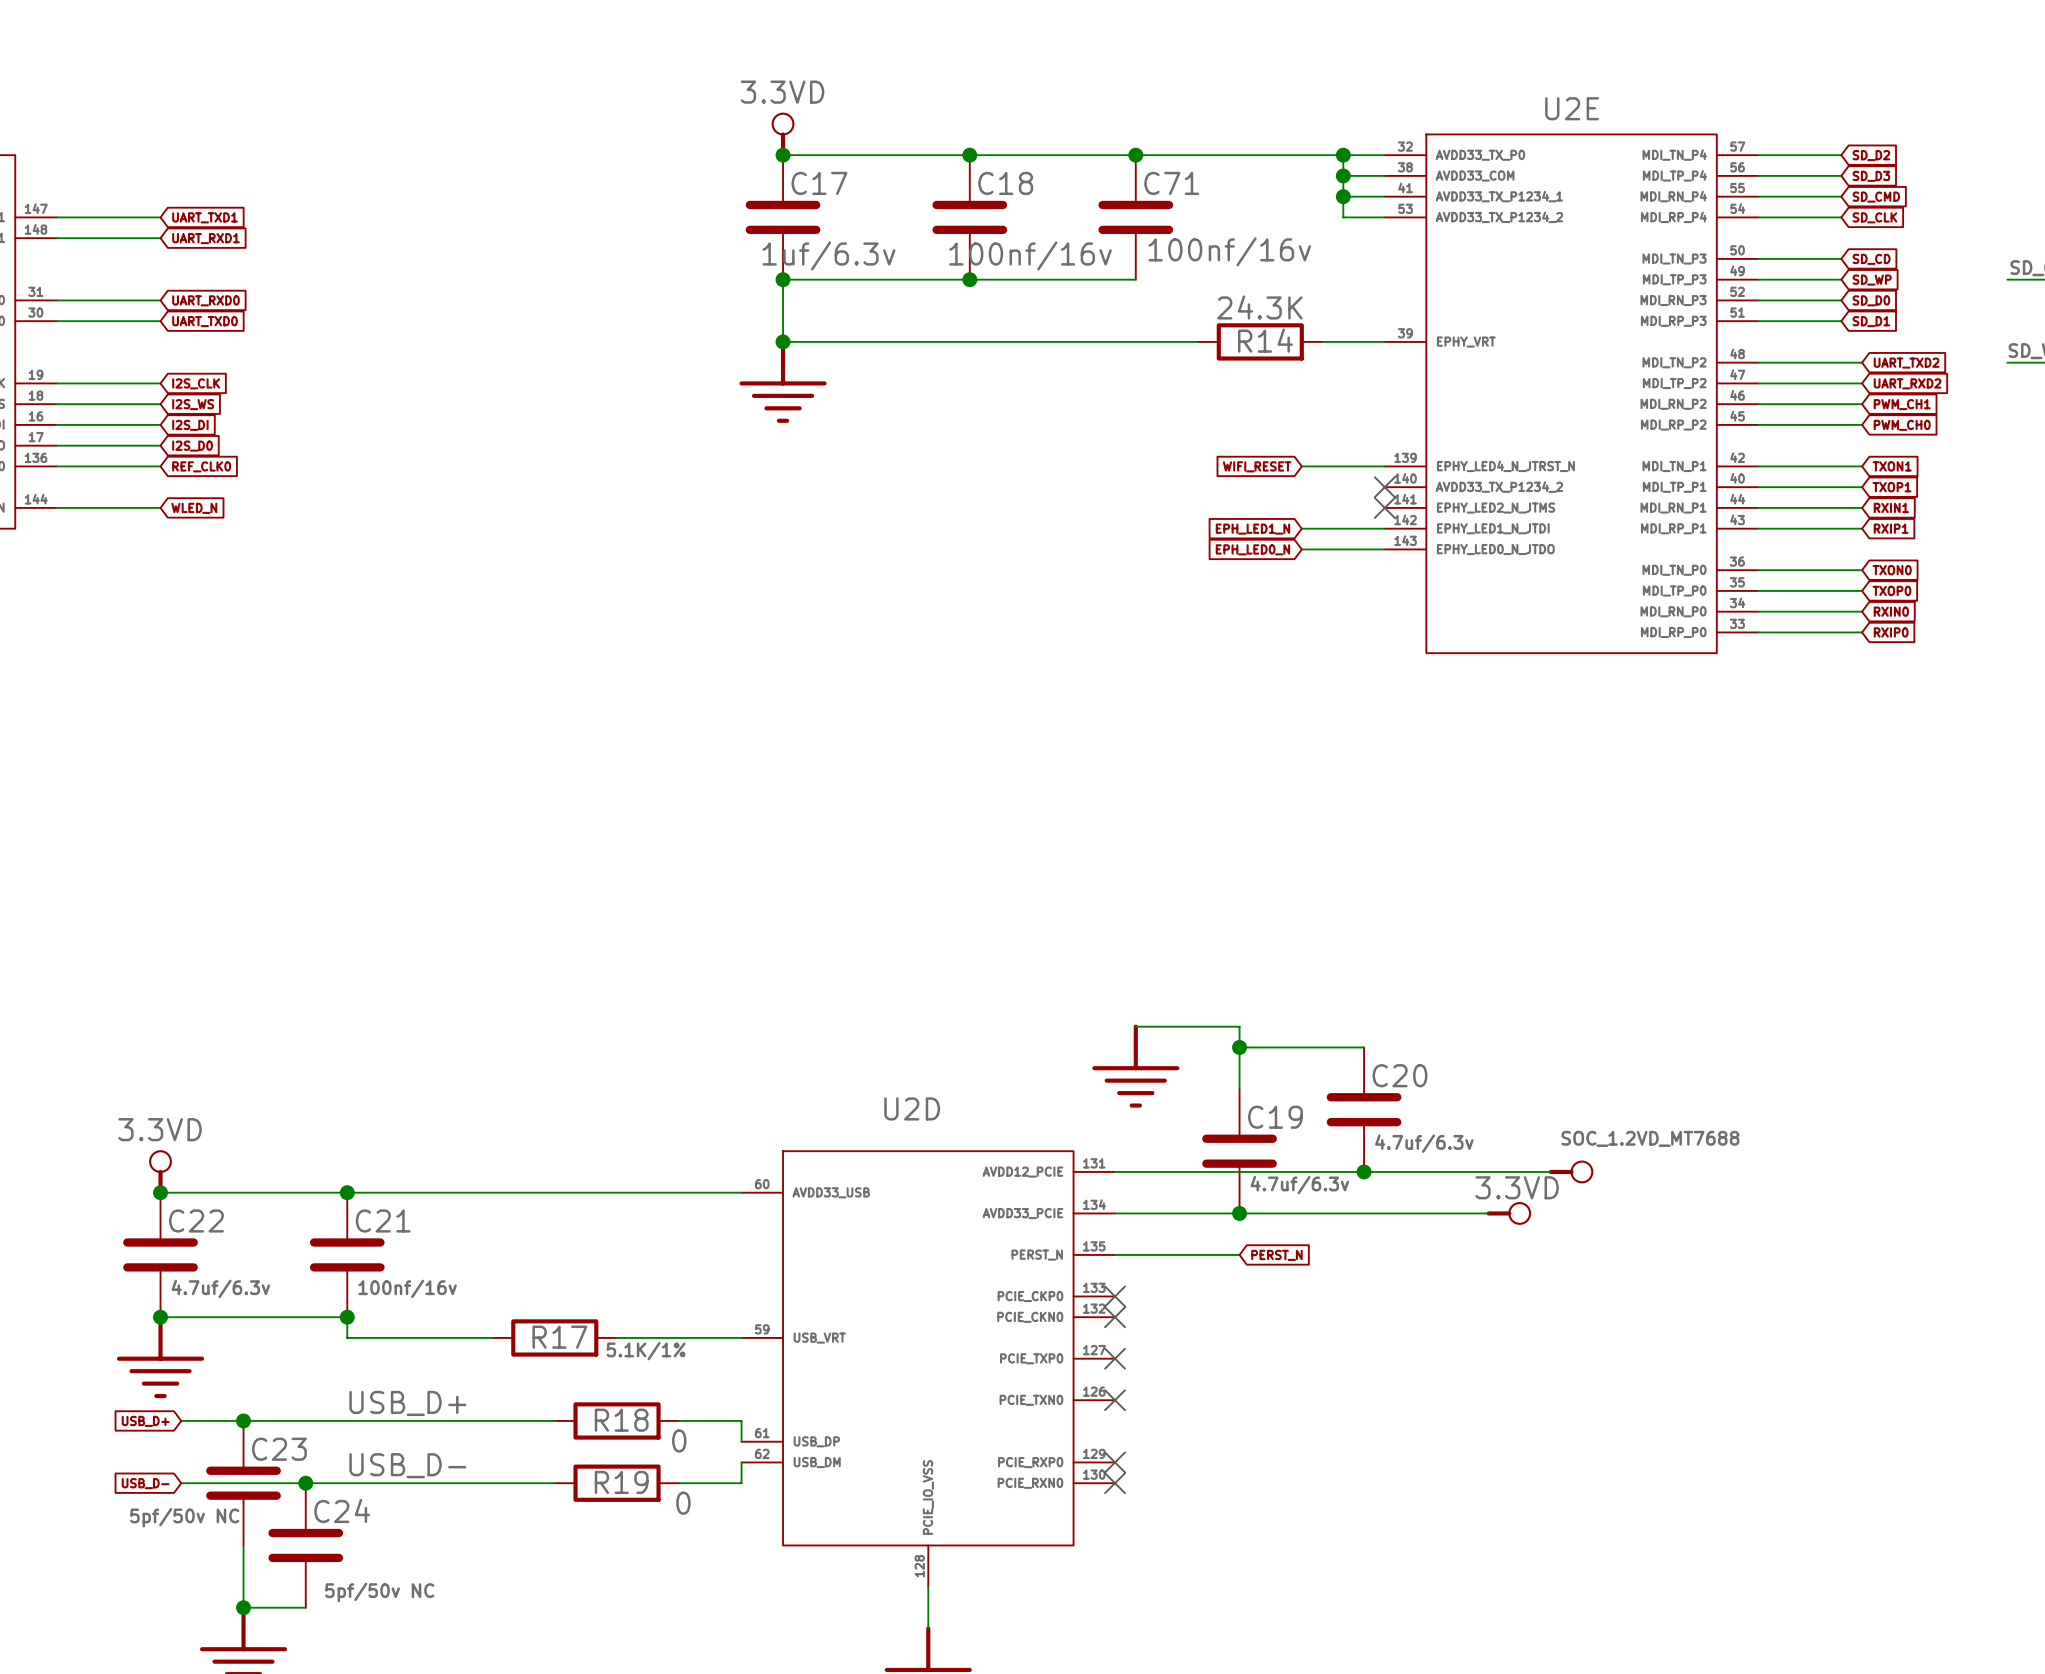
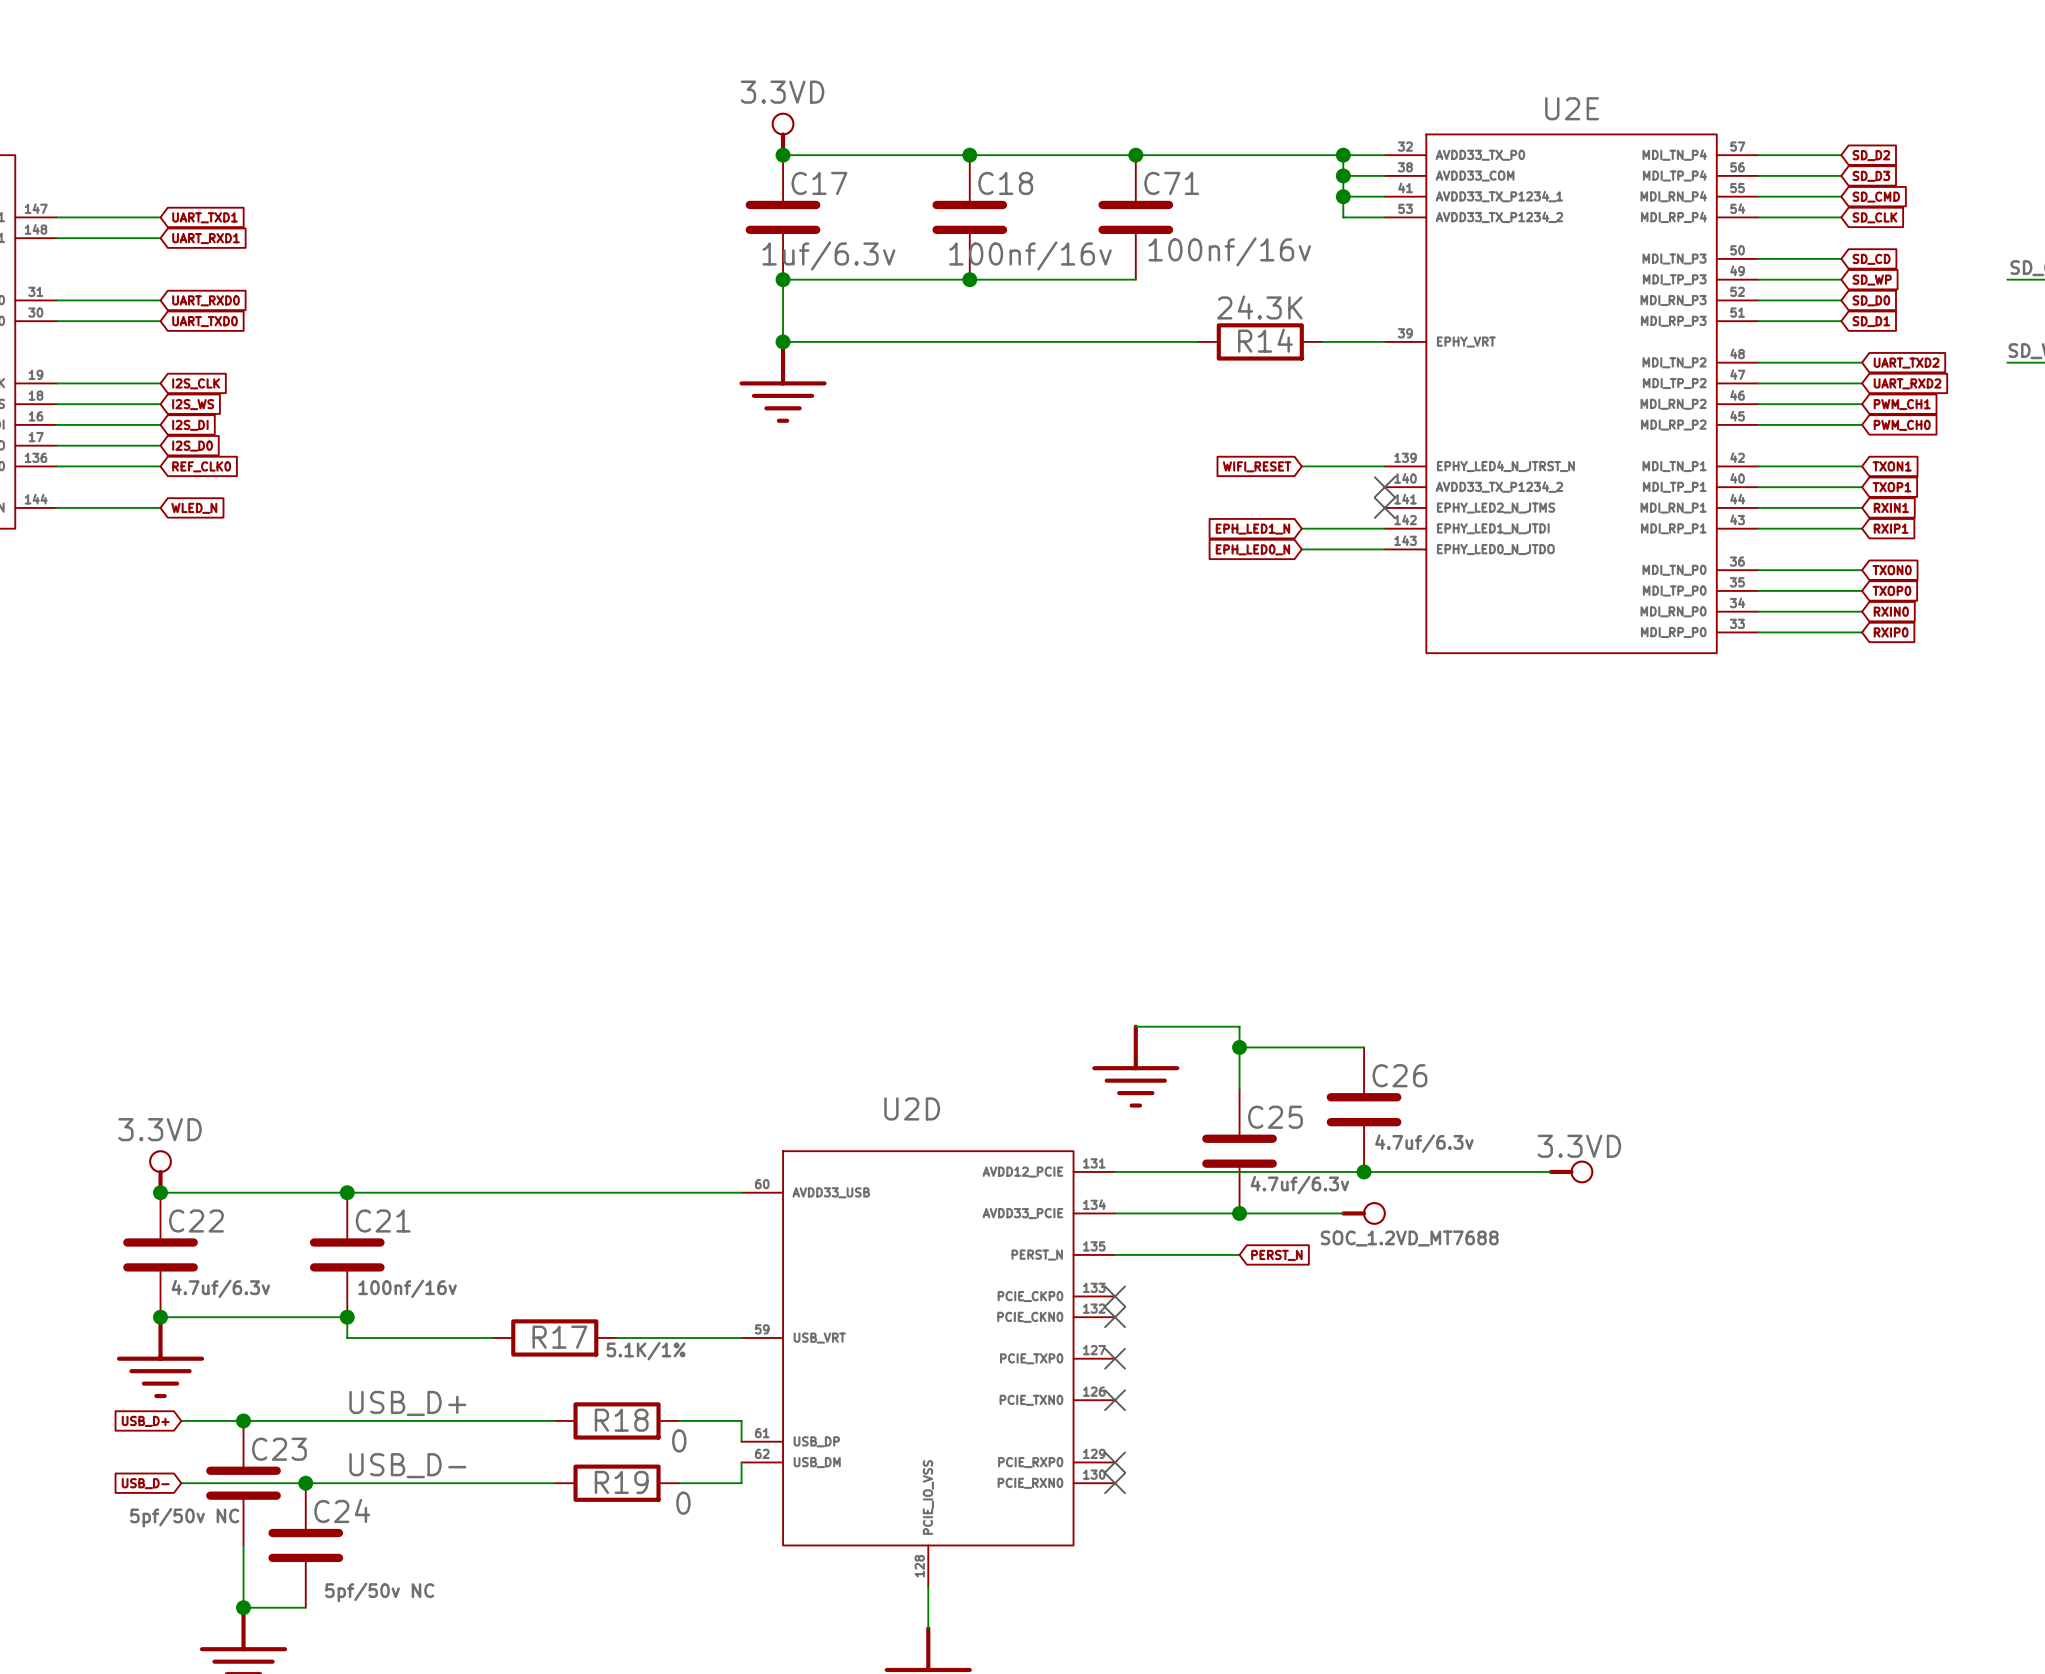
C20 name: C20 (1399, 1075) -> C26 (1399, 1075)
C19 name: C19 (1275, 1117) -> C25 (1275, 1117)
power symbol: SOC_1.2VD_MT7688 (1571, 1171) -> 3.3VD (1571, 1171)
wire: (1343, 1213) (1488, 1213) -> none
power symbol: none -> SOC_1.2VD_MT7688 (1363, 1213)
power symbol: 3.3VD (1508, 1213) -> none

